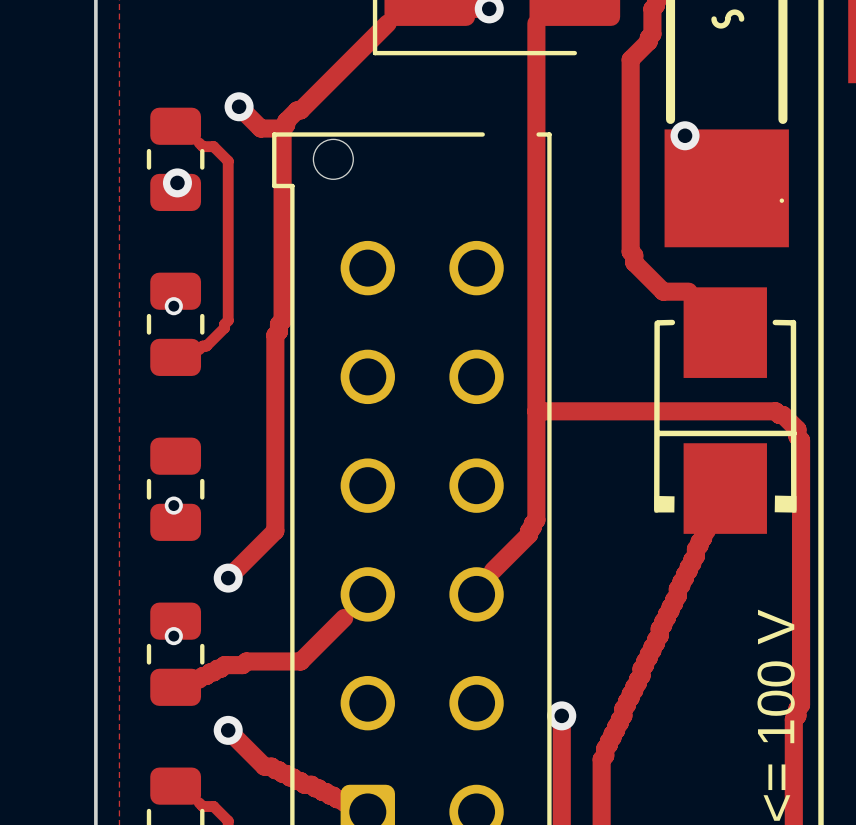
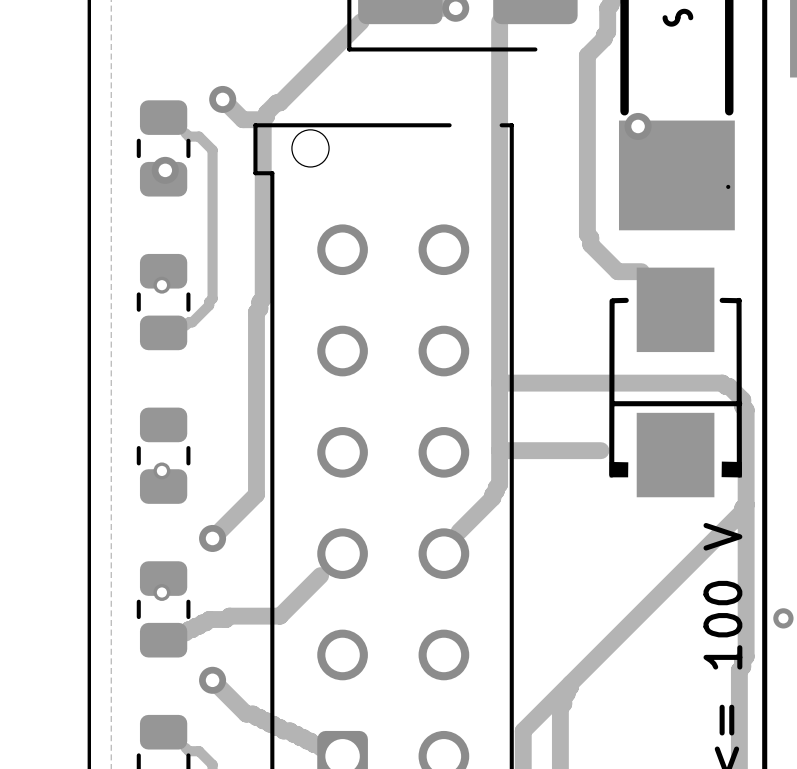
track: none -> (499, 450) (600, 450)
track: (706, 530) (695, 549) (695, 556) (677, 588) (677, 596) (659, 628) (659, 636) (641, 668) (641, 675) (623, 708) (623, 715) (619, 719) (616, 730) -> (746, 504) (742, 508) (742, 511) (573, 680)
via: none -> (783, 618)
track: (561, 715) (561, 784) -> (570, 683) (523, 730)
via: (561, 715) -> none

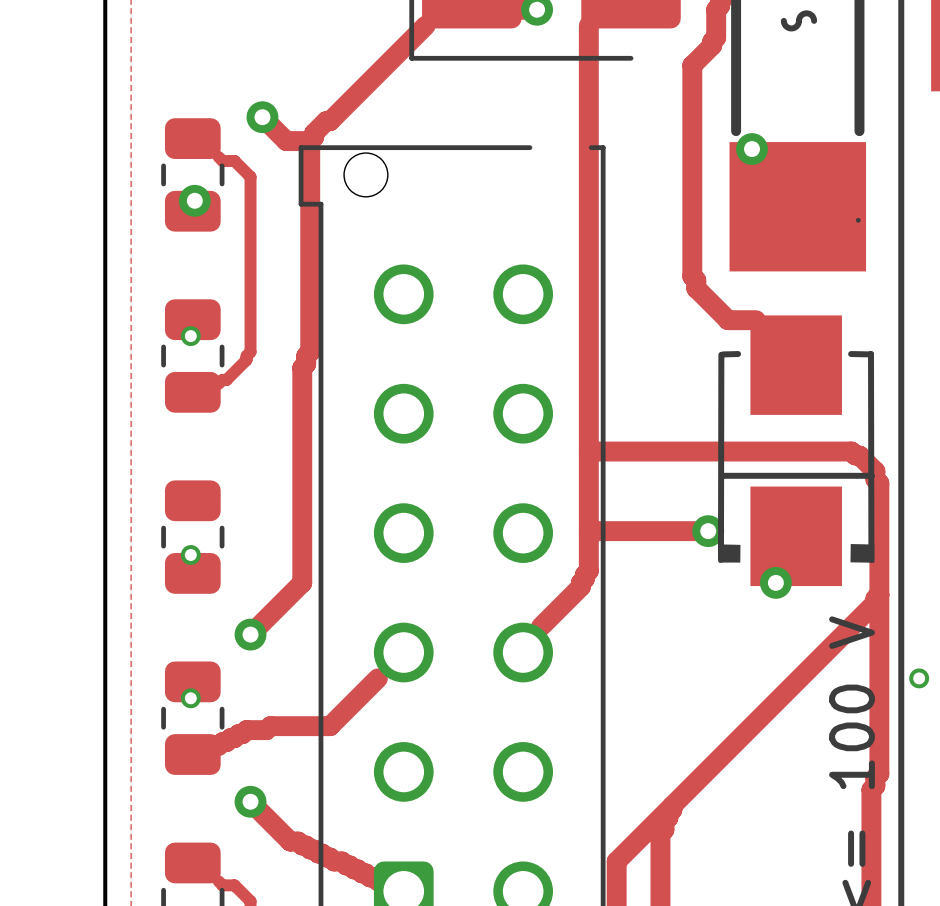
via: none -> (708, 531)
via: none -> (775, 582)
via: none -> (919, 678)
via: (783, 618) -> none

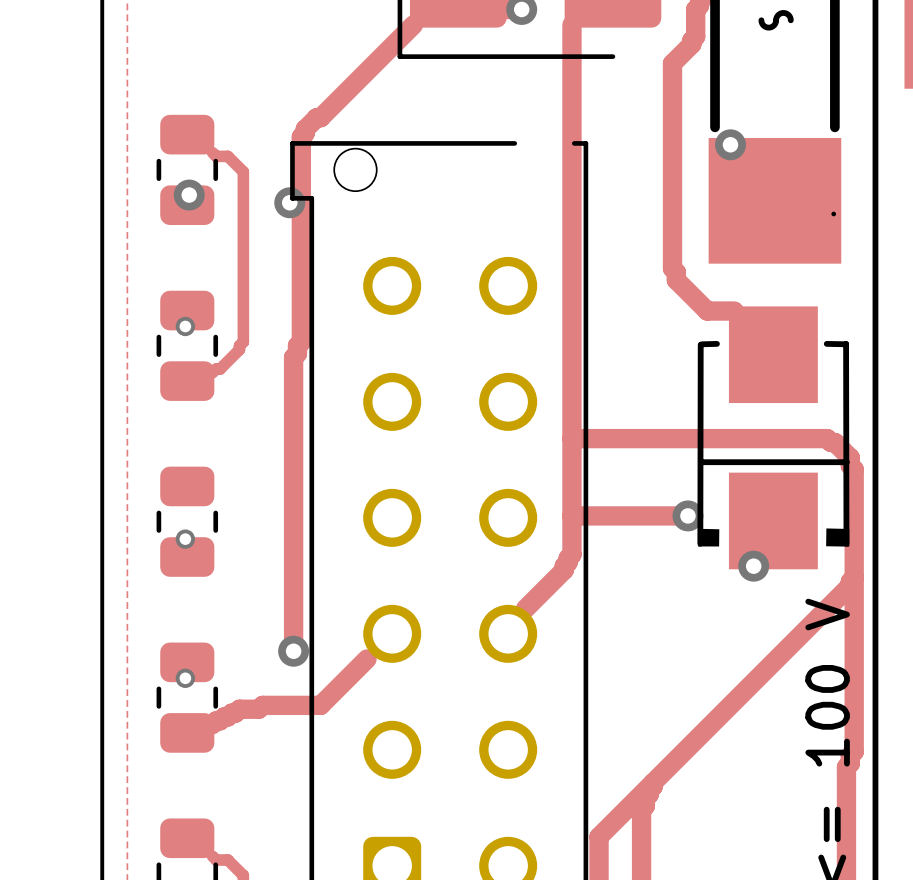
track: (262, 117) (286, 141) (310, 141) -> none
via position: (262, 117) -> (289, 202)
track: (302, 582) (250, 634) -> (293, 566) (293, 651)
via position: (250, 634) -> (293, 651)
via: (919, 678) -> none
track: (250, 801) (290, 841) (298, 841) (318, 853) (330, 857) (334, 861) (342, 861) (346, 865) (350, 865) (361, 873) (373, 877) (377, 881) -> none
via: (250, 801) -> none

